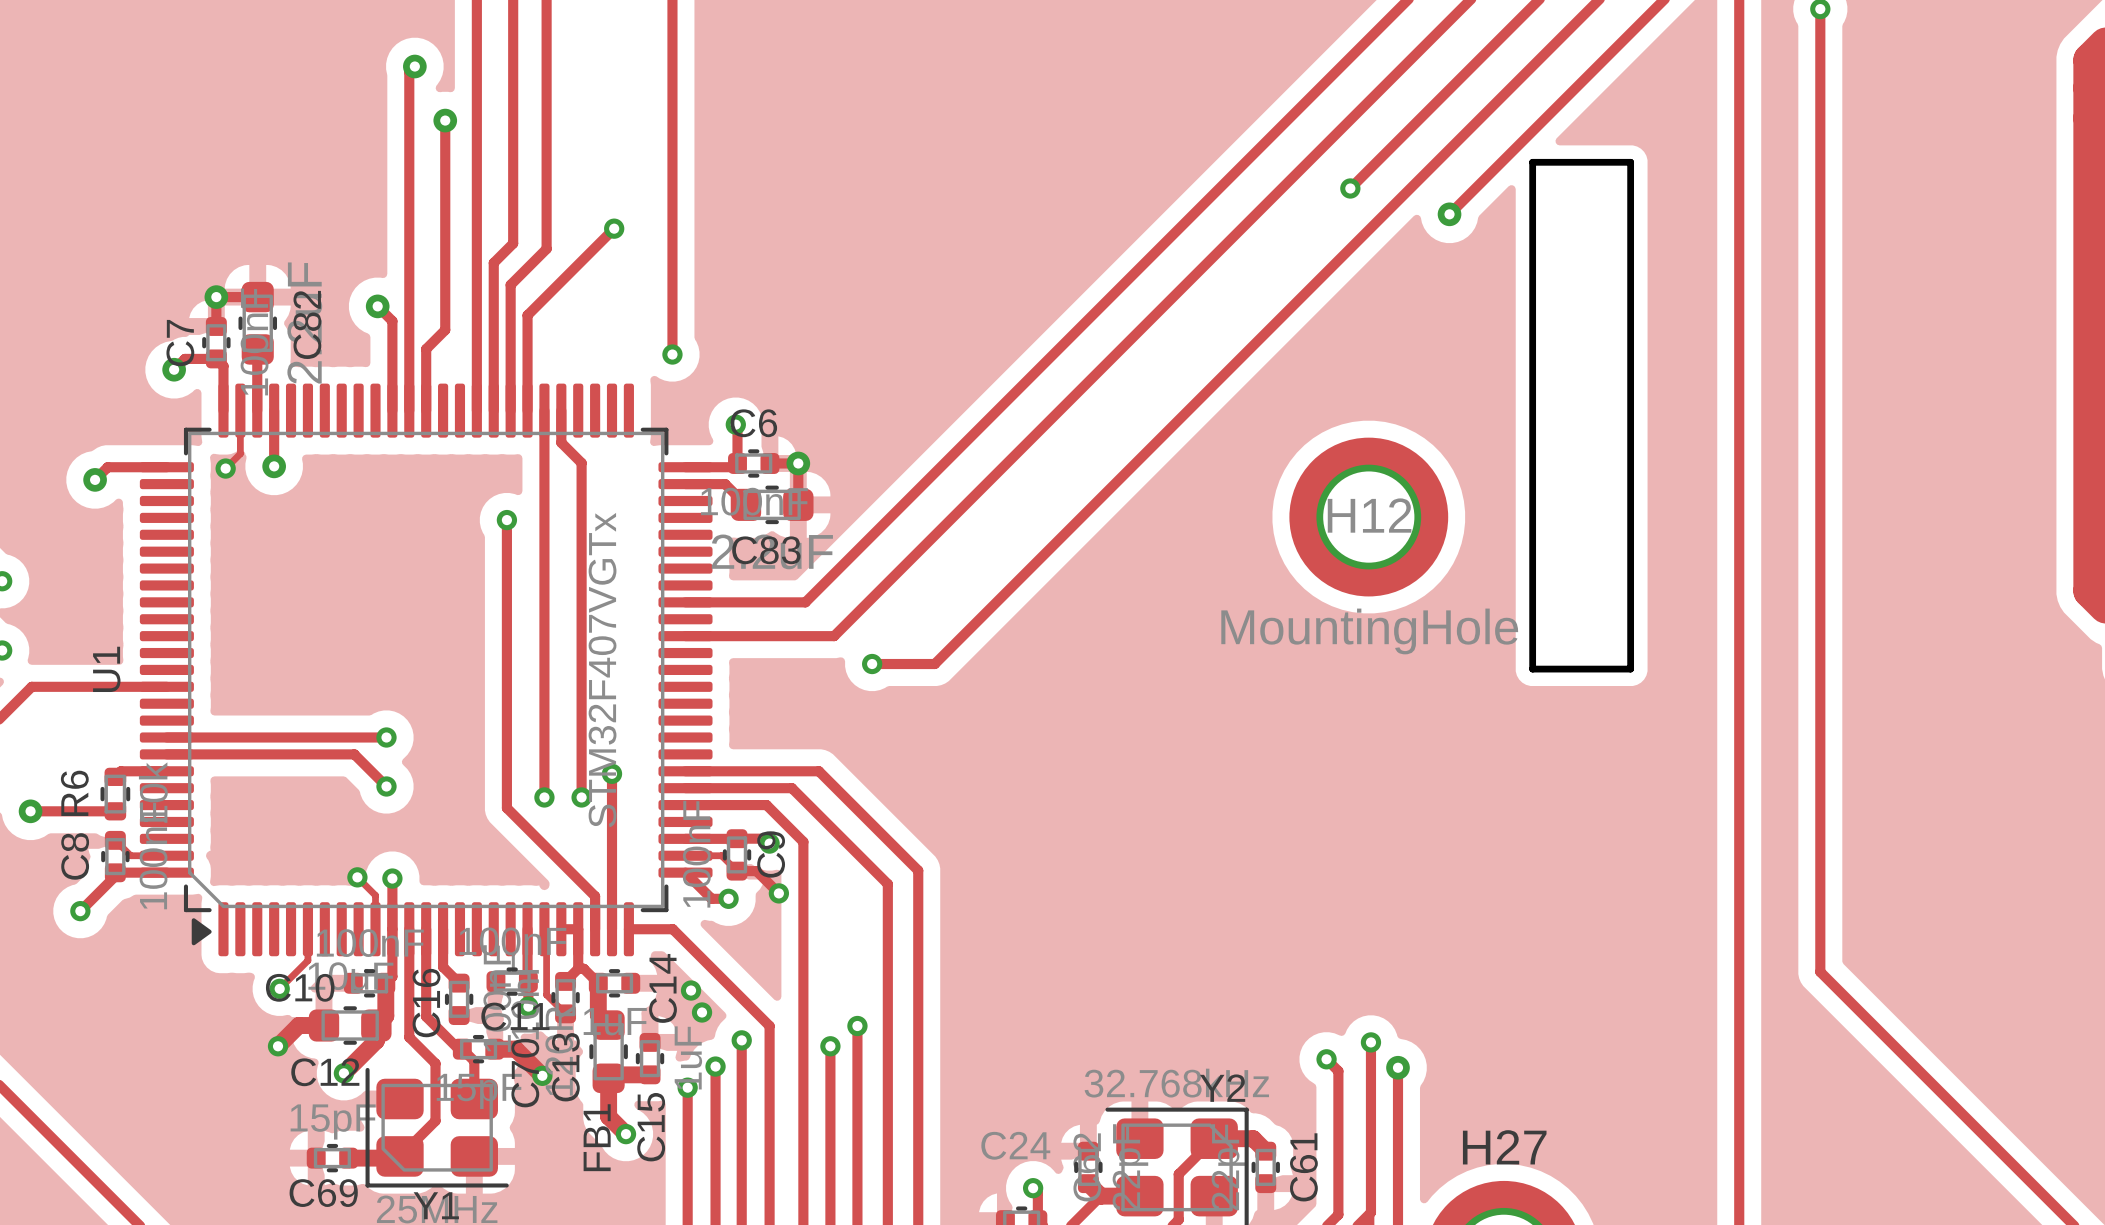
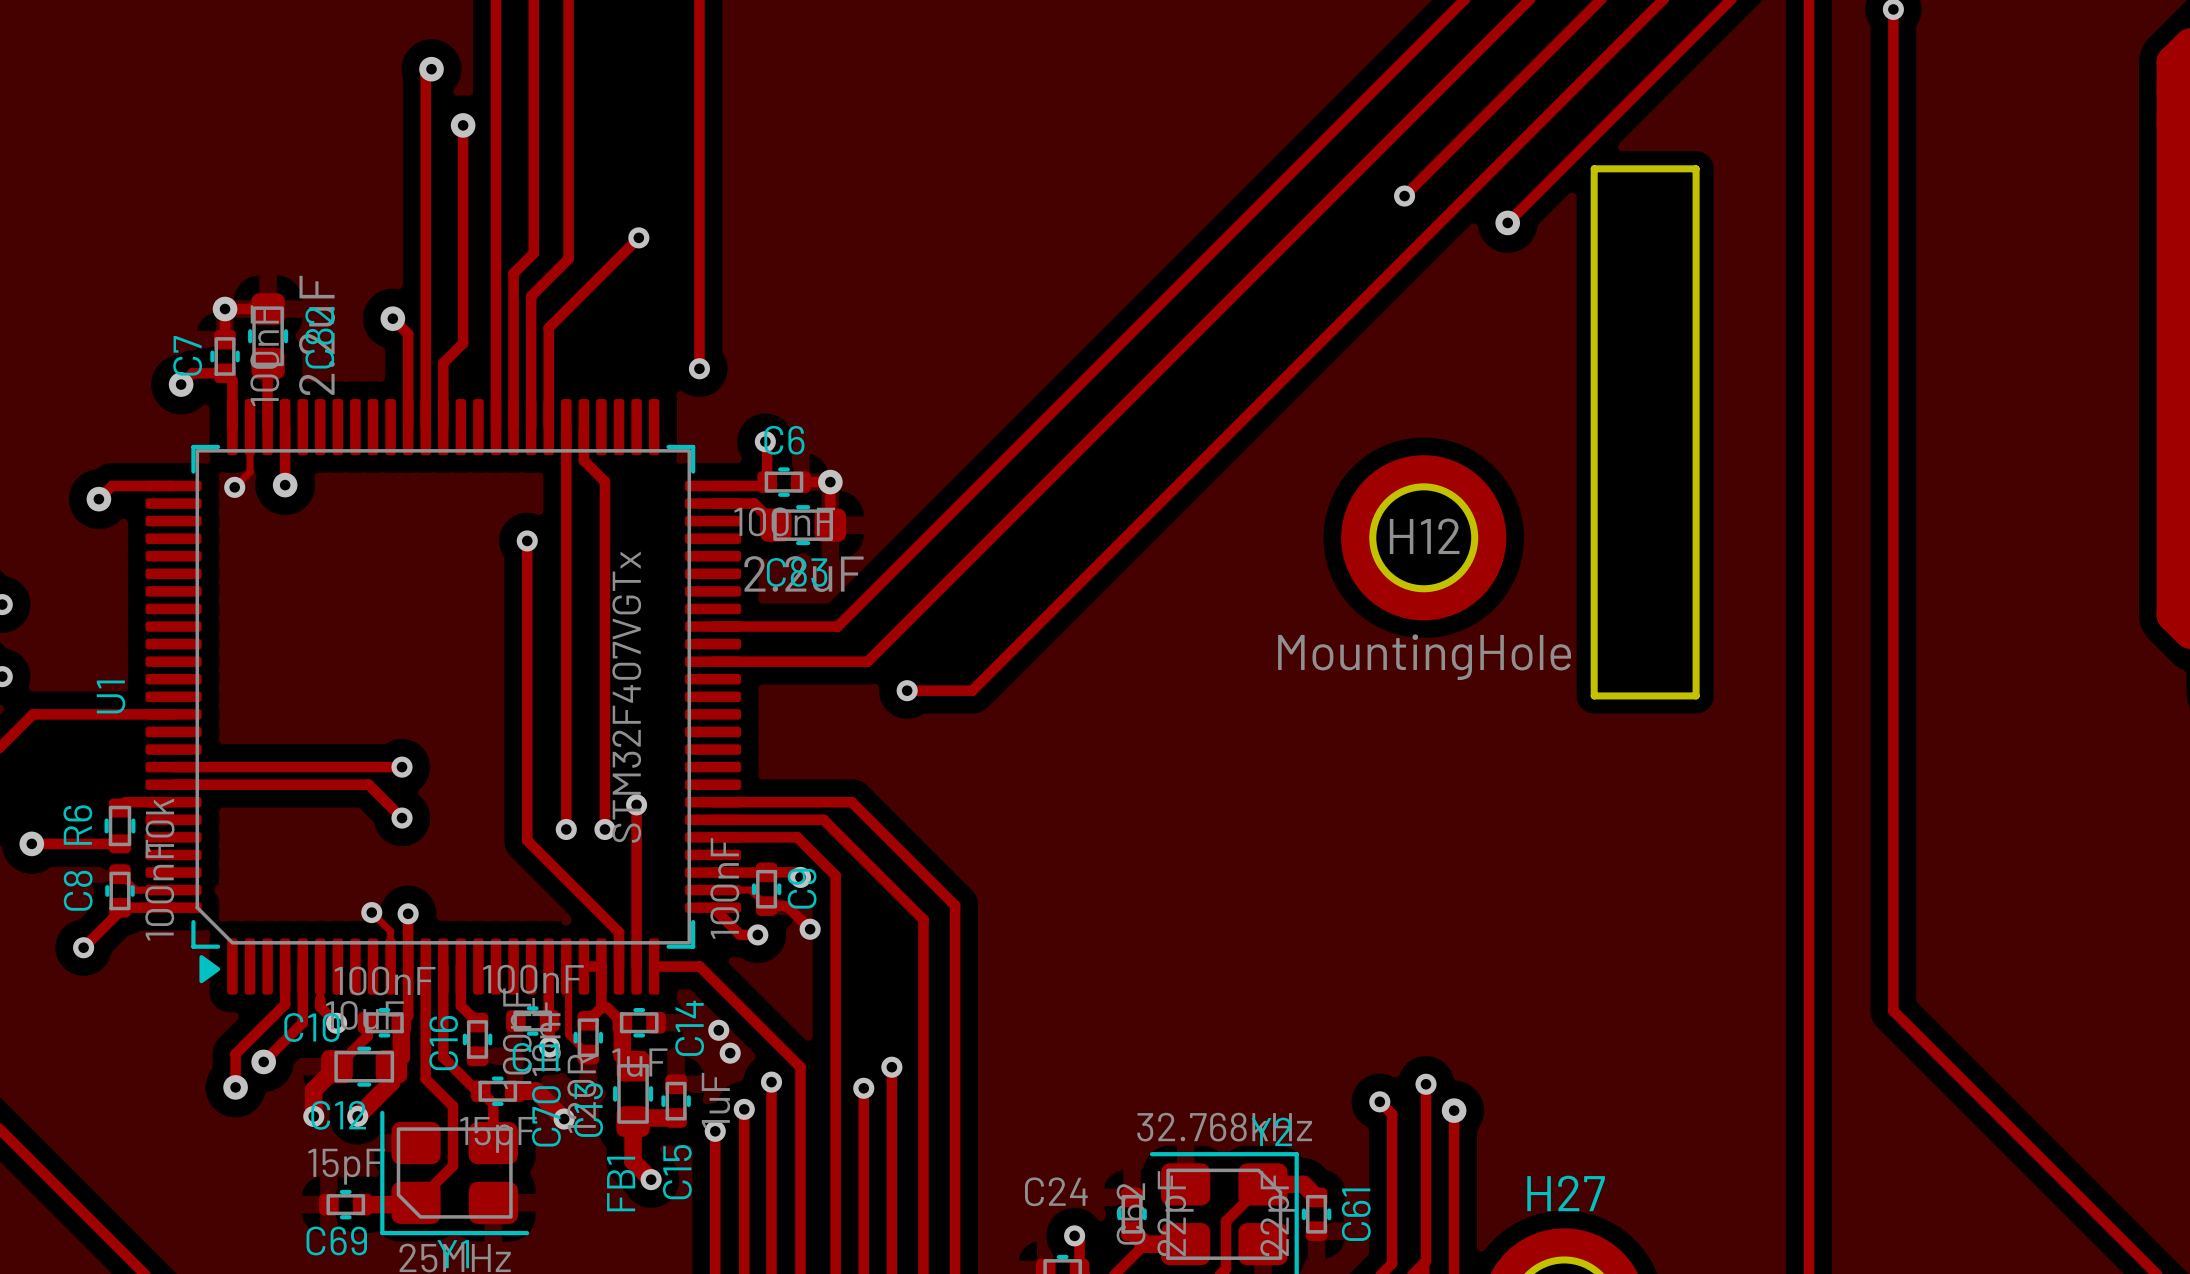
track: none -> (285, 966) (285, 1004) (235, 1054) (235, 1087)
track: none -> (302, 966) (302, 1022) (263, 1061)
track: (307, 960) (279, 988) -> (320, 999) (320, 1006) (336, 1023)
via: none -> (336, 1023)
track: none -> (367, 1022) (367, 1036) (313, 1089) (313, 1116)
via: (279, 988) -> none
via: none -> (263, 1061)
track: (323, 1025) (298, 1025) (278, 1046) -> none
via: none -> (235, 1087)
via position: (278, 1046) -> (313, 1116)

